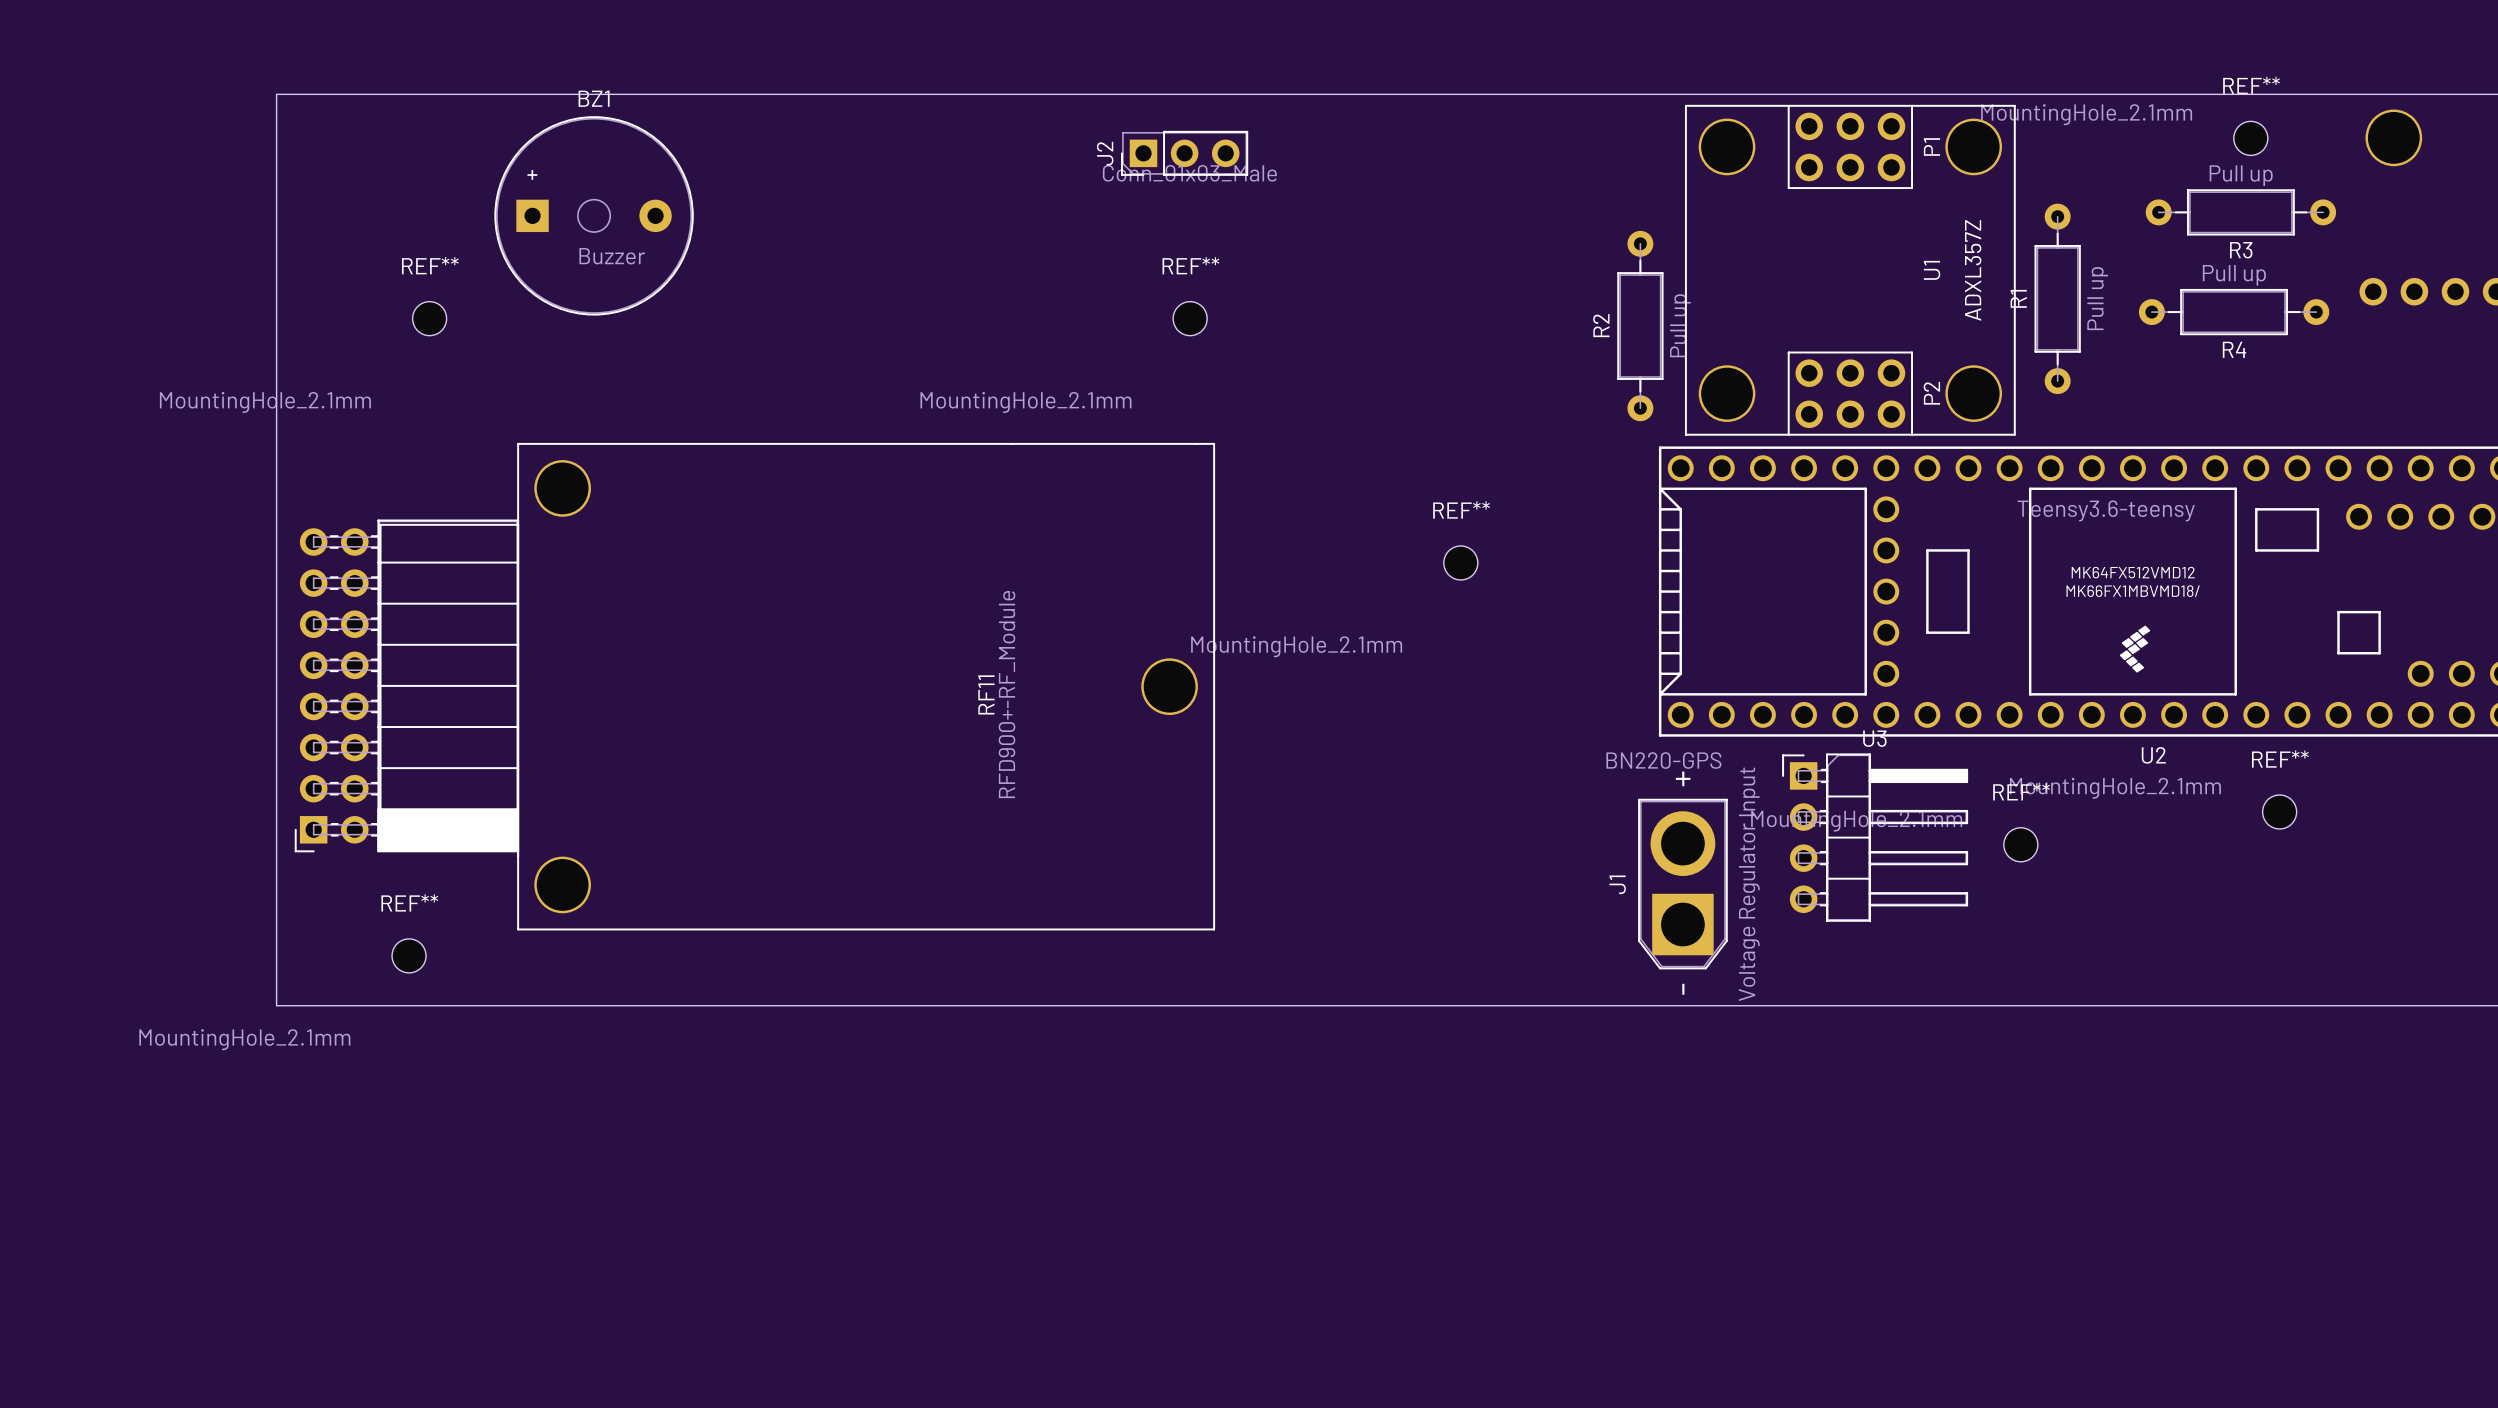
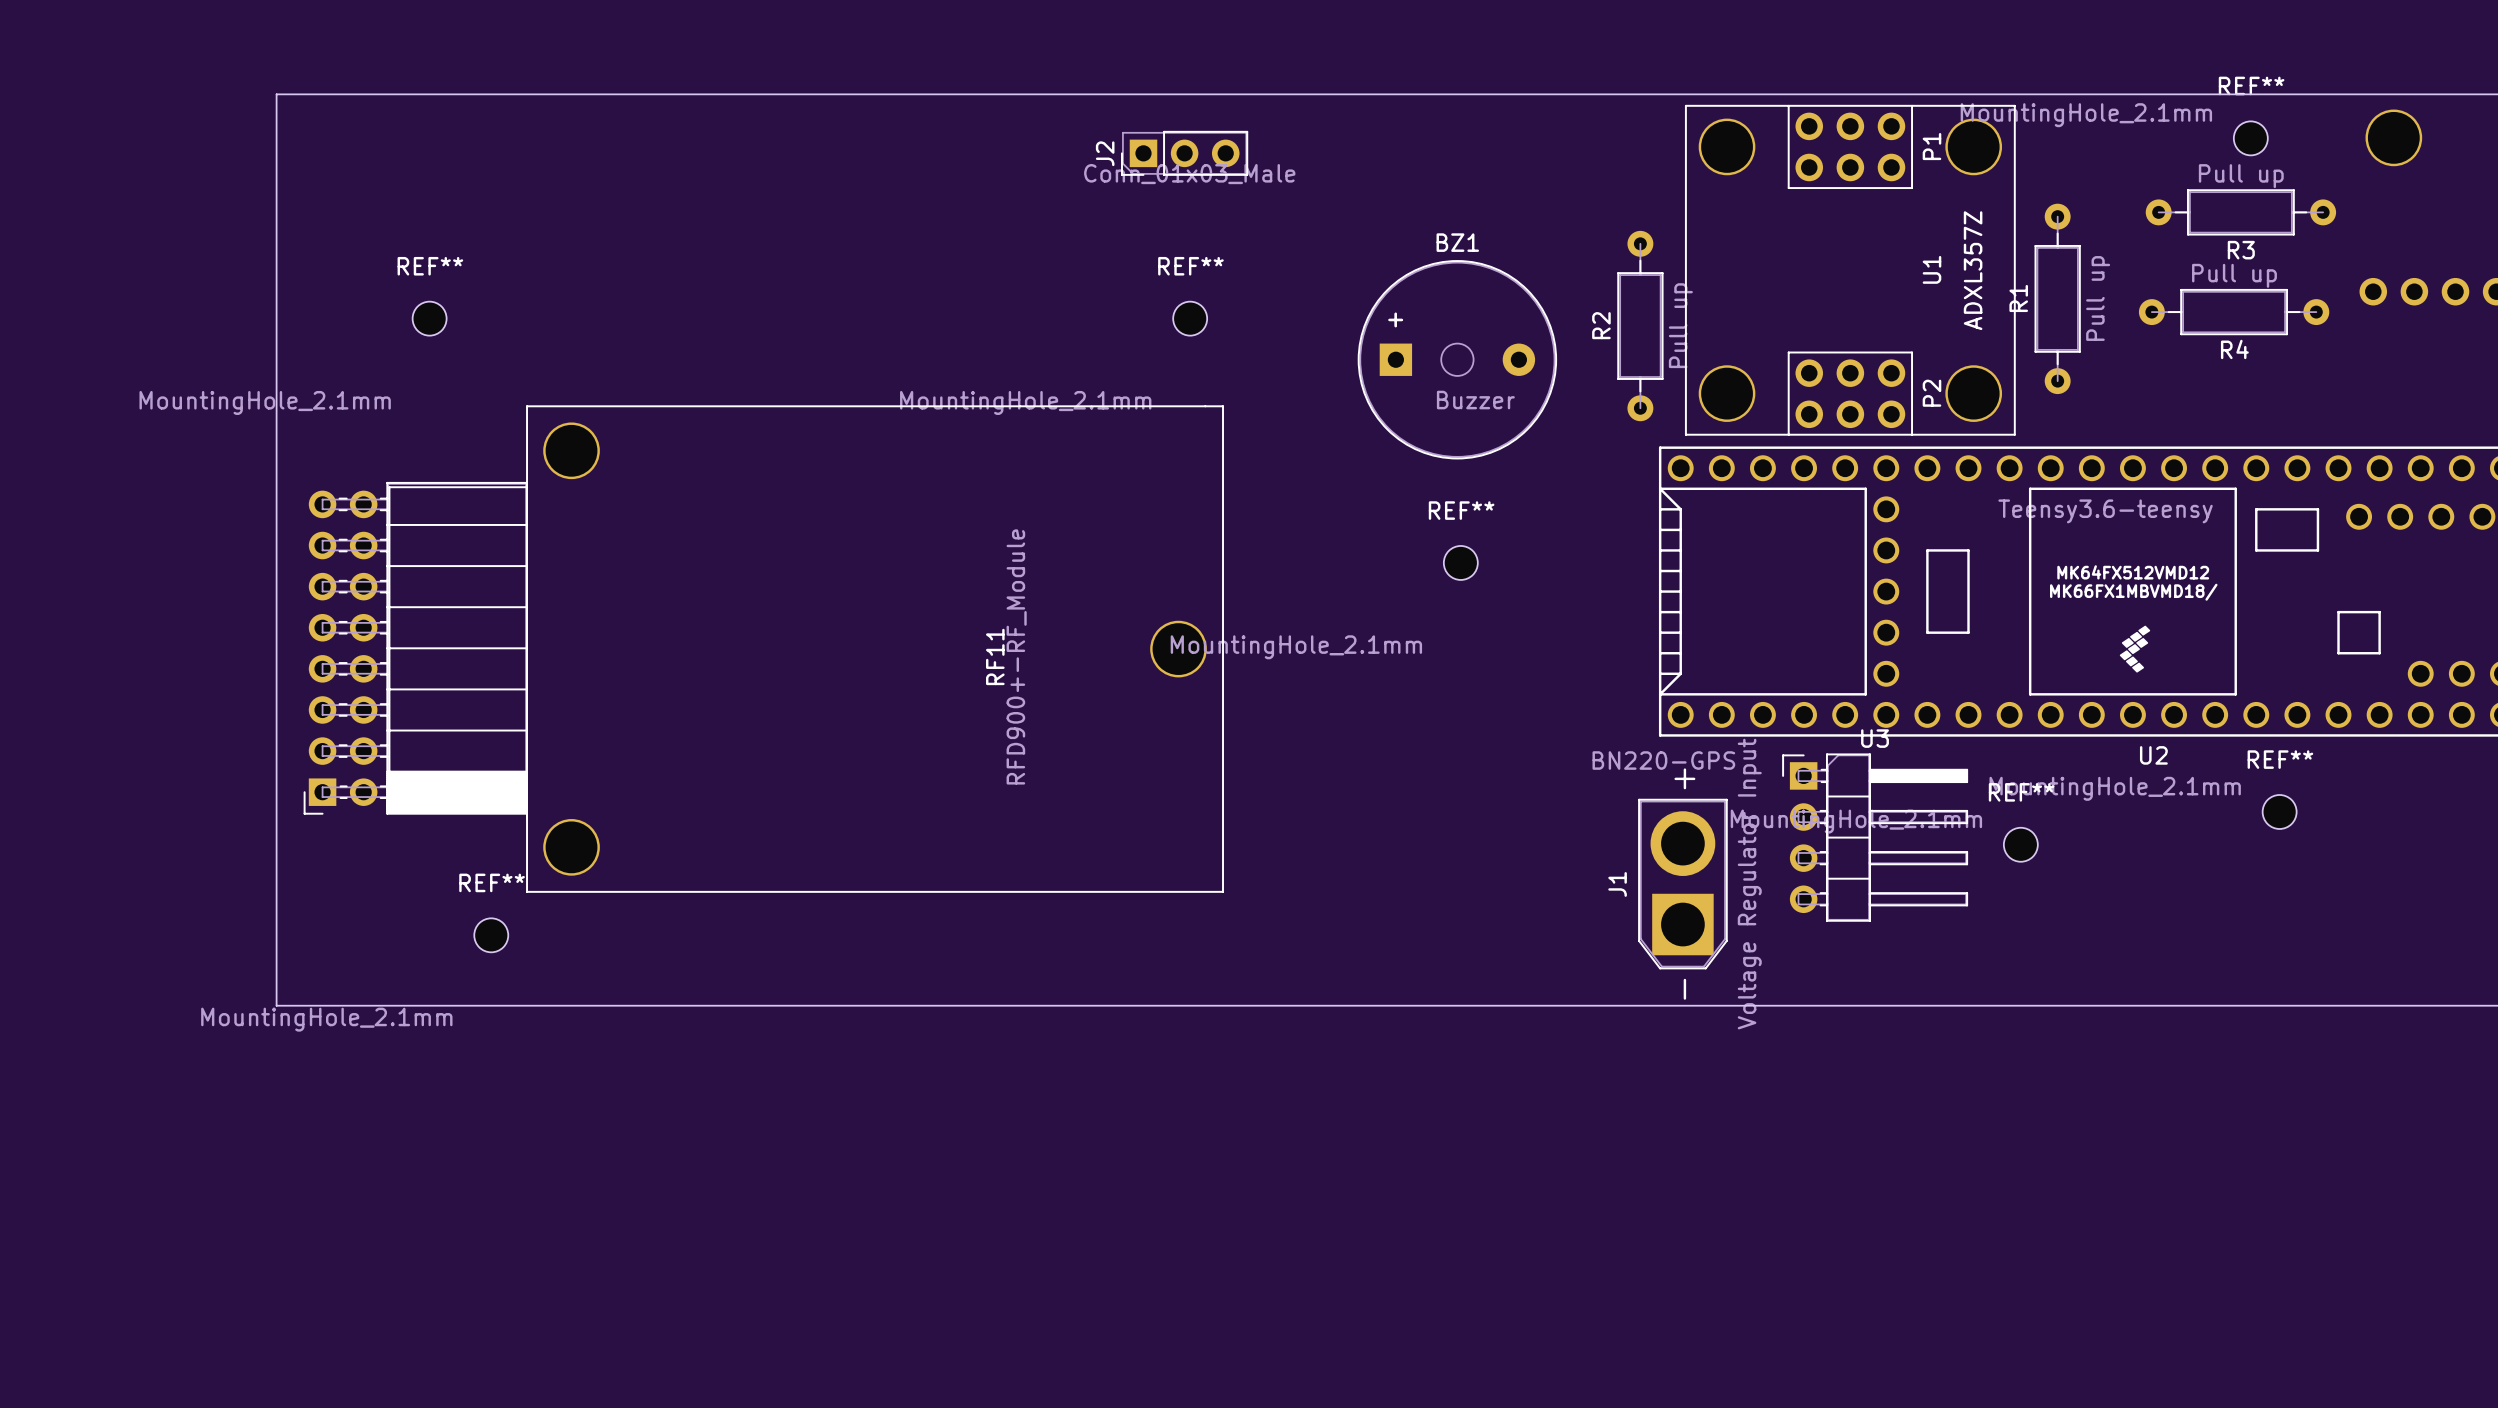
BZ1 position: (594, 215) -> (1457, 359)
RF11 position: (754, 686) -> (763, 649)
REF** position: (409, 955) -> (491, 935)

